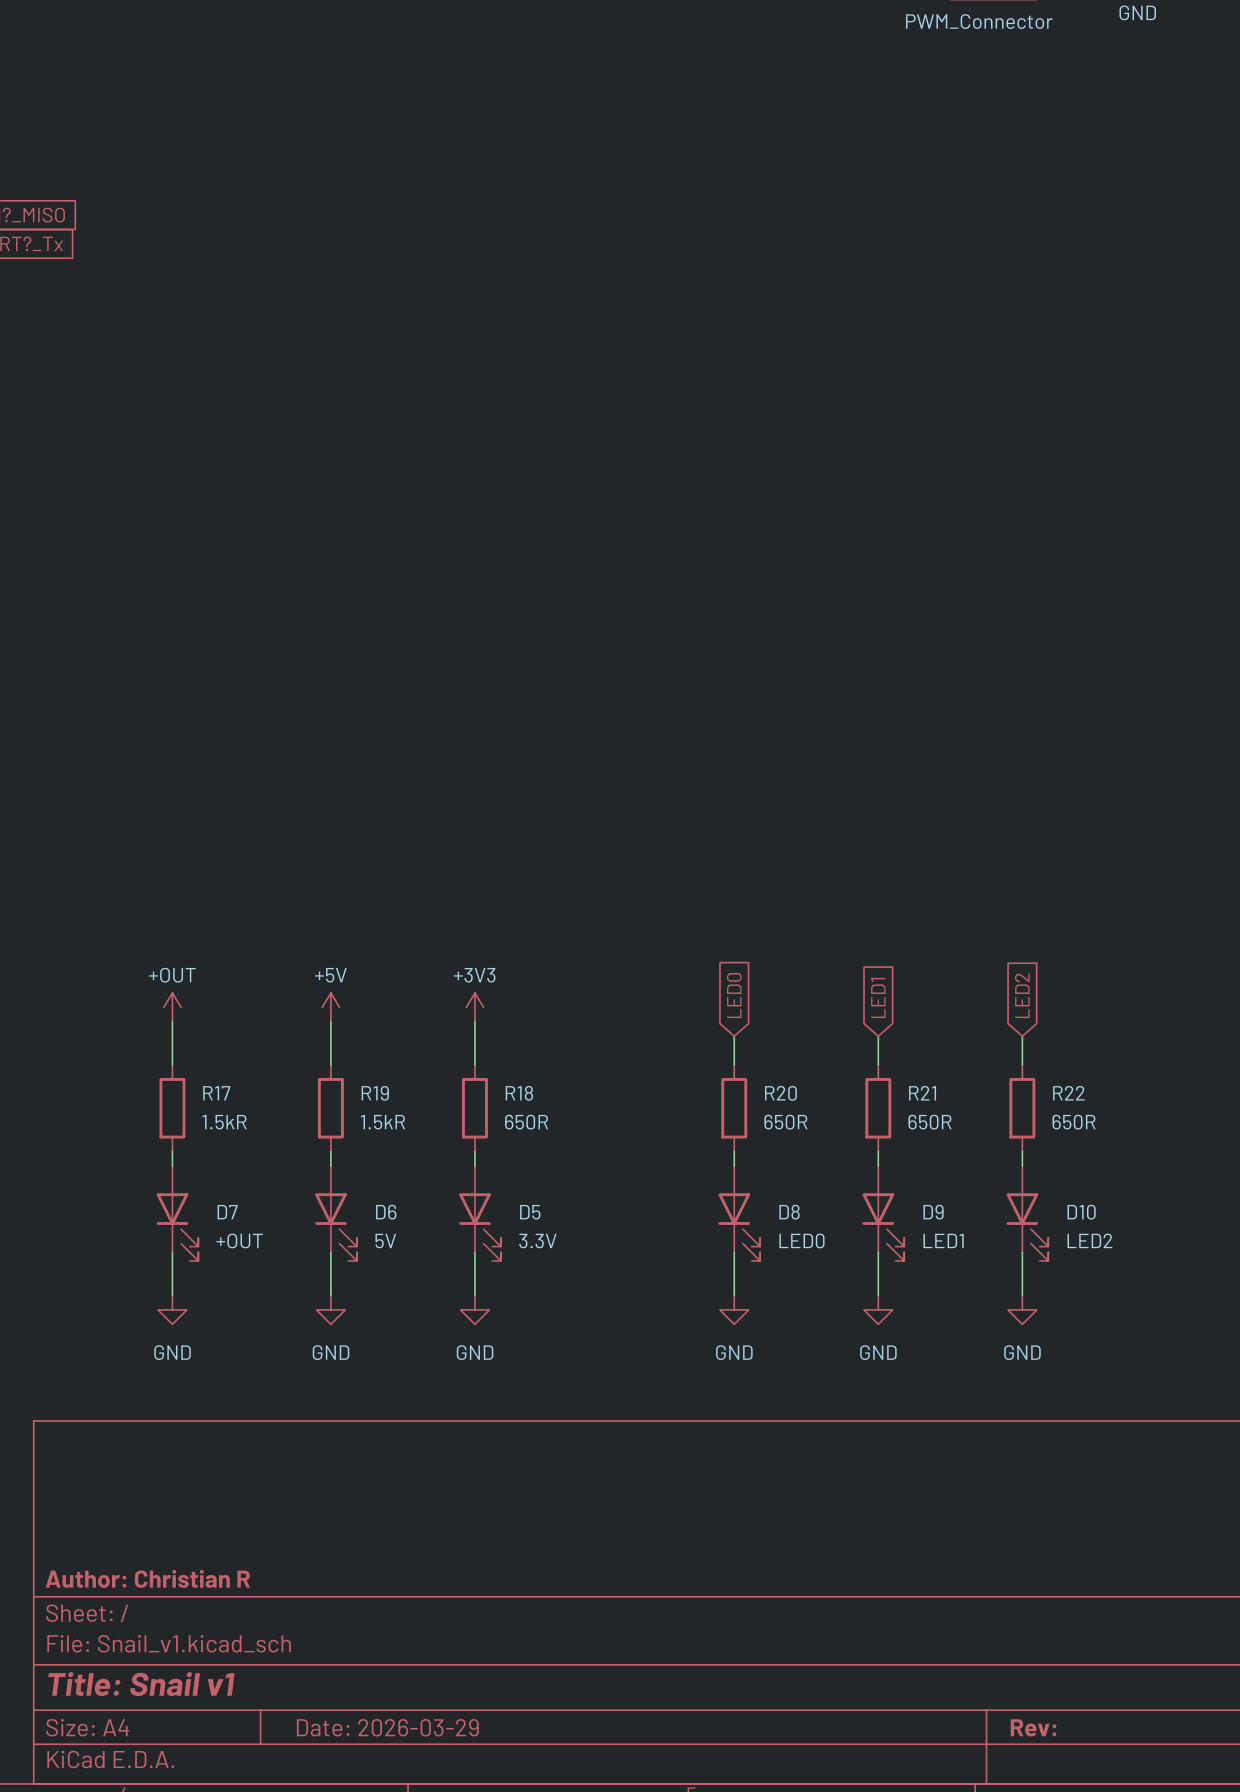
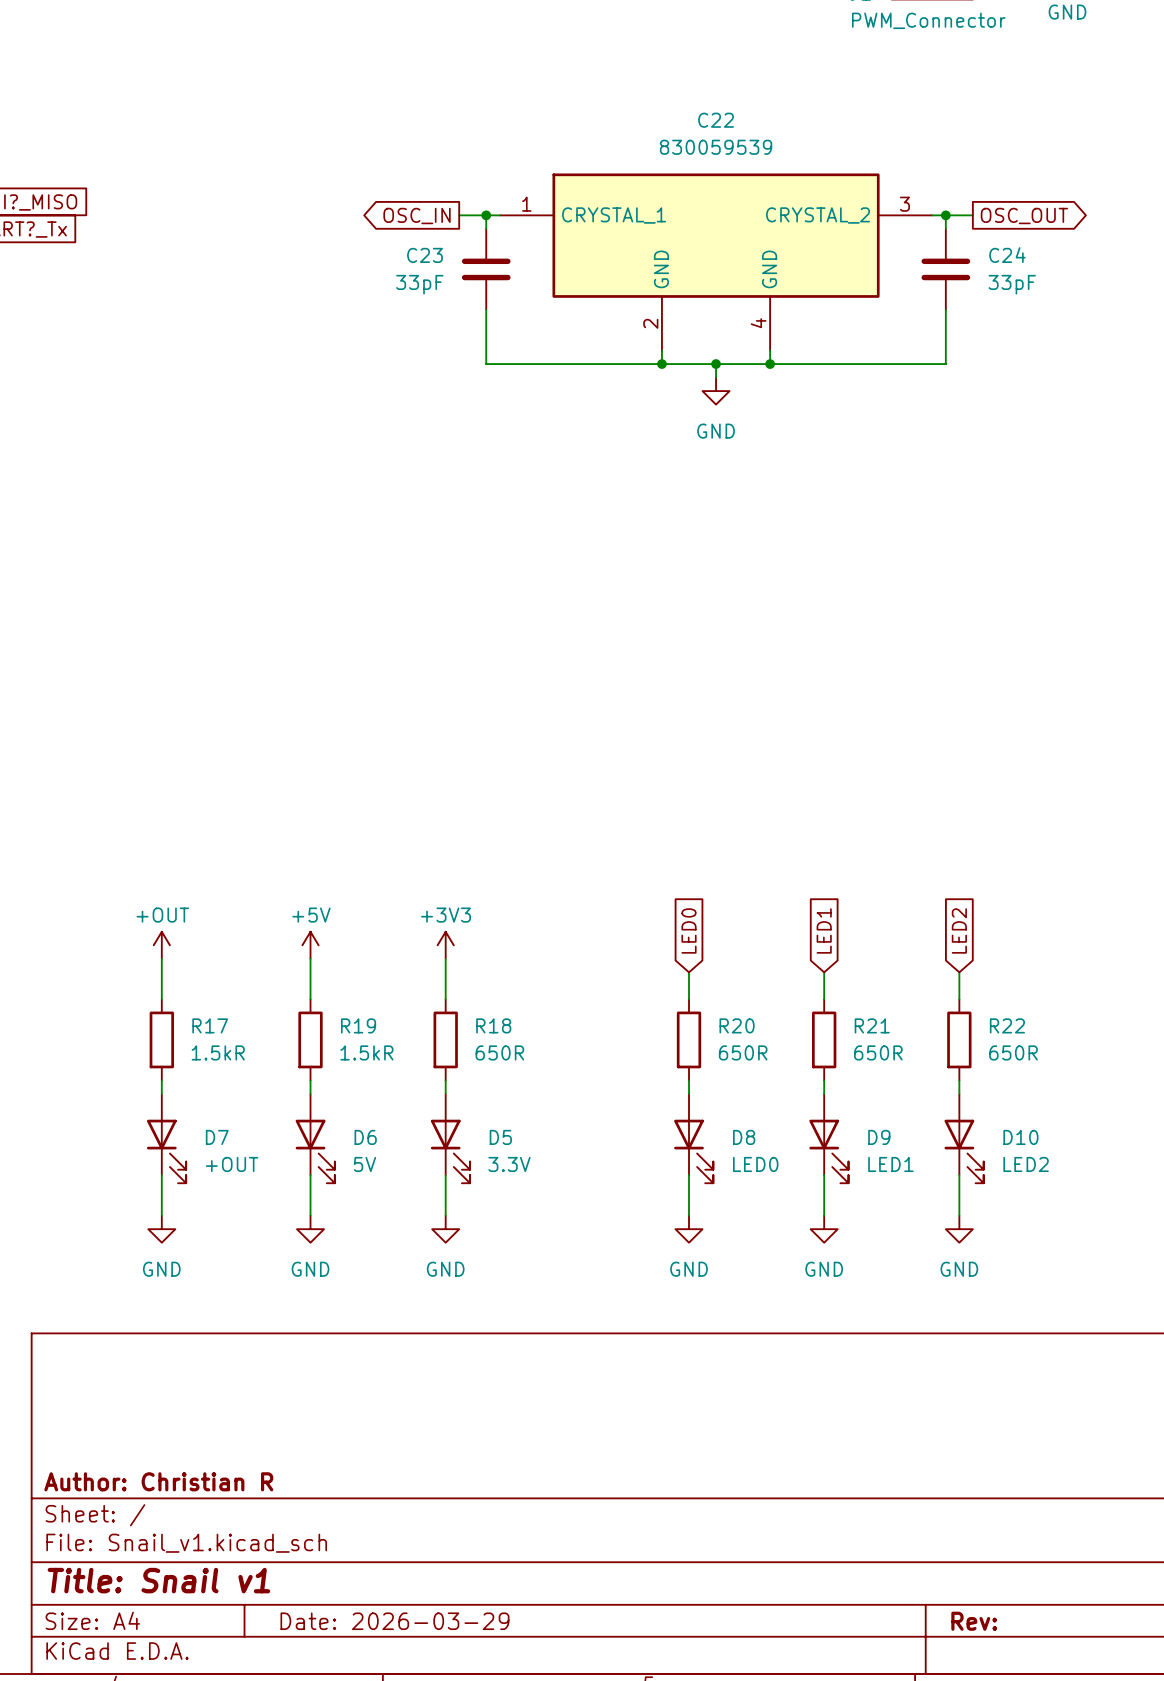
global label: none -> OSC_IN (417, 216)
wire: none -> (459, 215) (499, 215)
wire: none -> (486, 215) (486, 228)
junction: none -> (486, 215)
wire: none -> (932, 215) (972, 215)
wire: none -> (945, 215) (945, 228)
junction: none -> (945, 215)
global label: none -> OSC_OUT (1024, 216)
C22: none -> 830059539 (716, 261)
C23: none -> 33pF (486, 269)
C24: none -> 33pF (945, 269)
wire: none -> (486, 309) (486, 364) (945, 364) (945, 309)
wire: none -> (661, 350) (661, 364)
wire: none -> (770, 350) (770, 364)
junction: none -> (661, 364)
wire: none -> (716, 364) (716, 377)
junction: none -> (716, 364)
junction: none -> (770, 364)
power symbol: none -> GND (716, 391)

